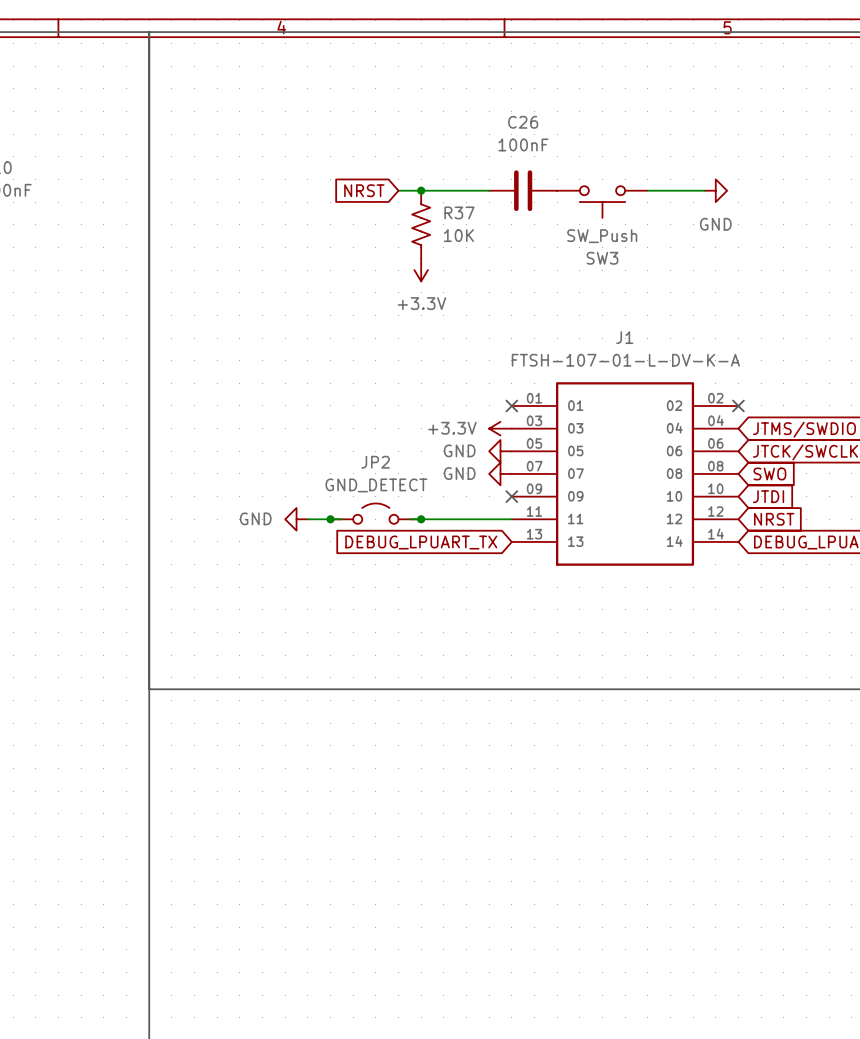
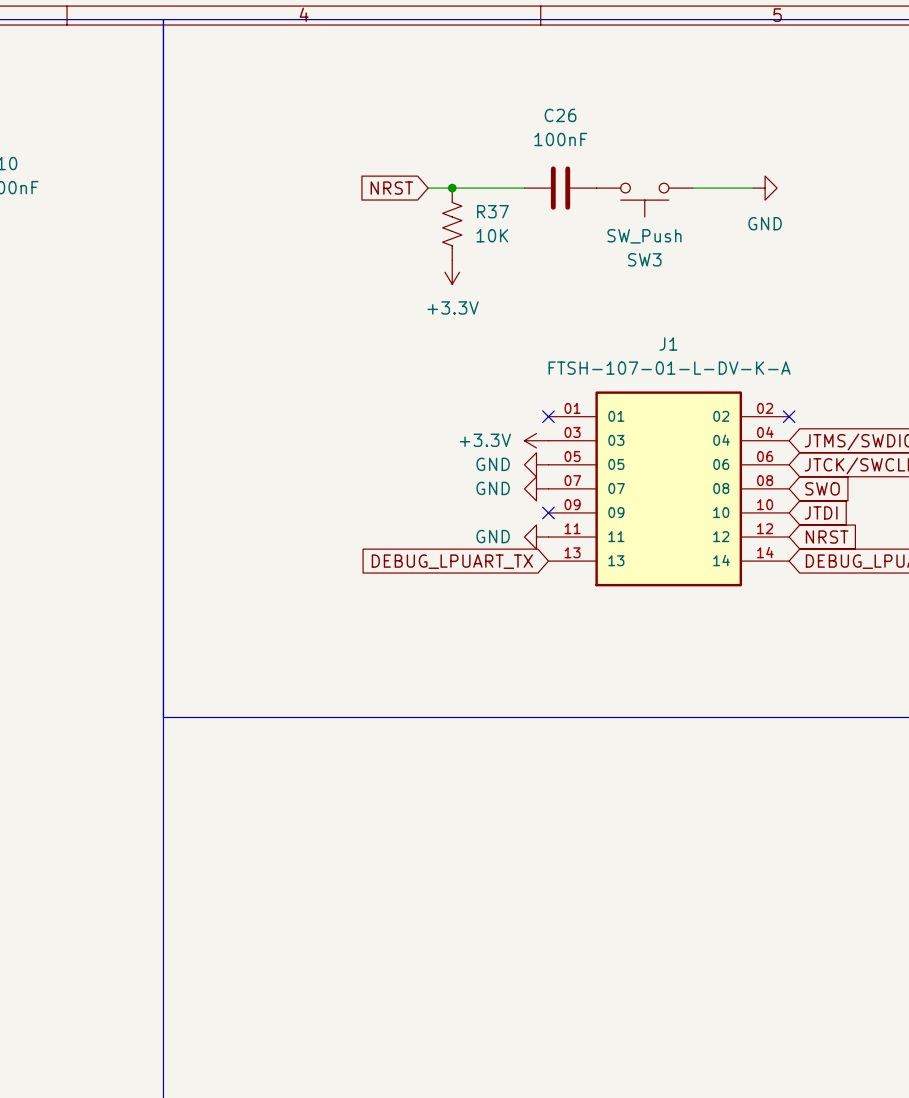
JP2: GND_DETECT (375, 513) -> none
power symbol position: GND (296, 519) -> GND (536, 537)
wire: (307, 519) (341, 519) -> none
junction: (330, 519) -> none
wire: (409, 519) (511, 519) -> none
junction: (421, 519) -> none

